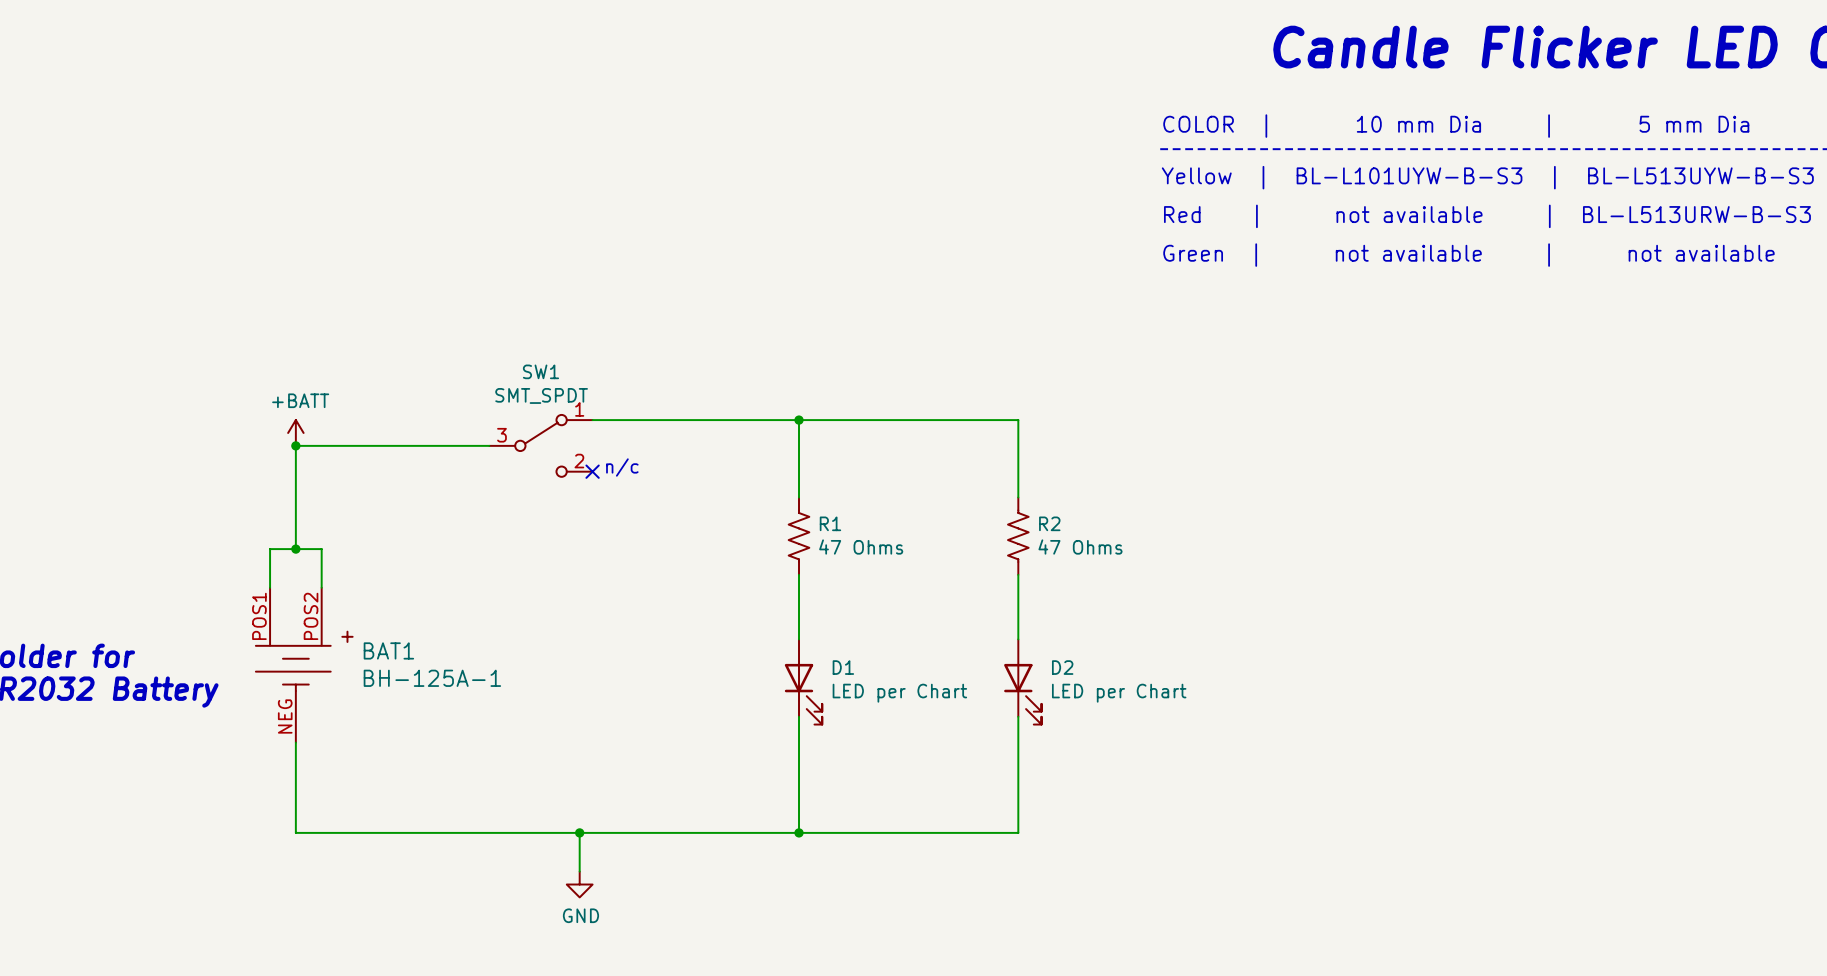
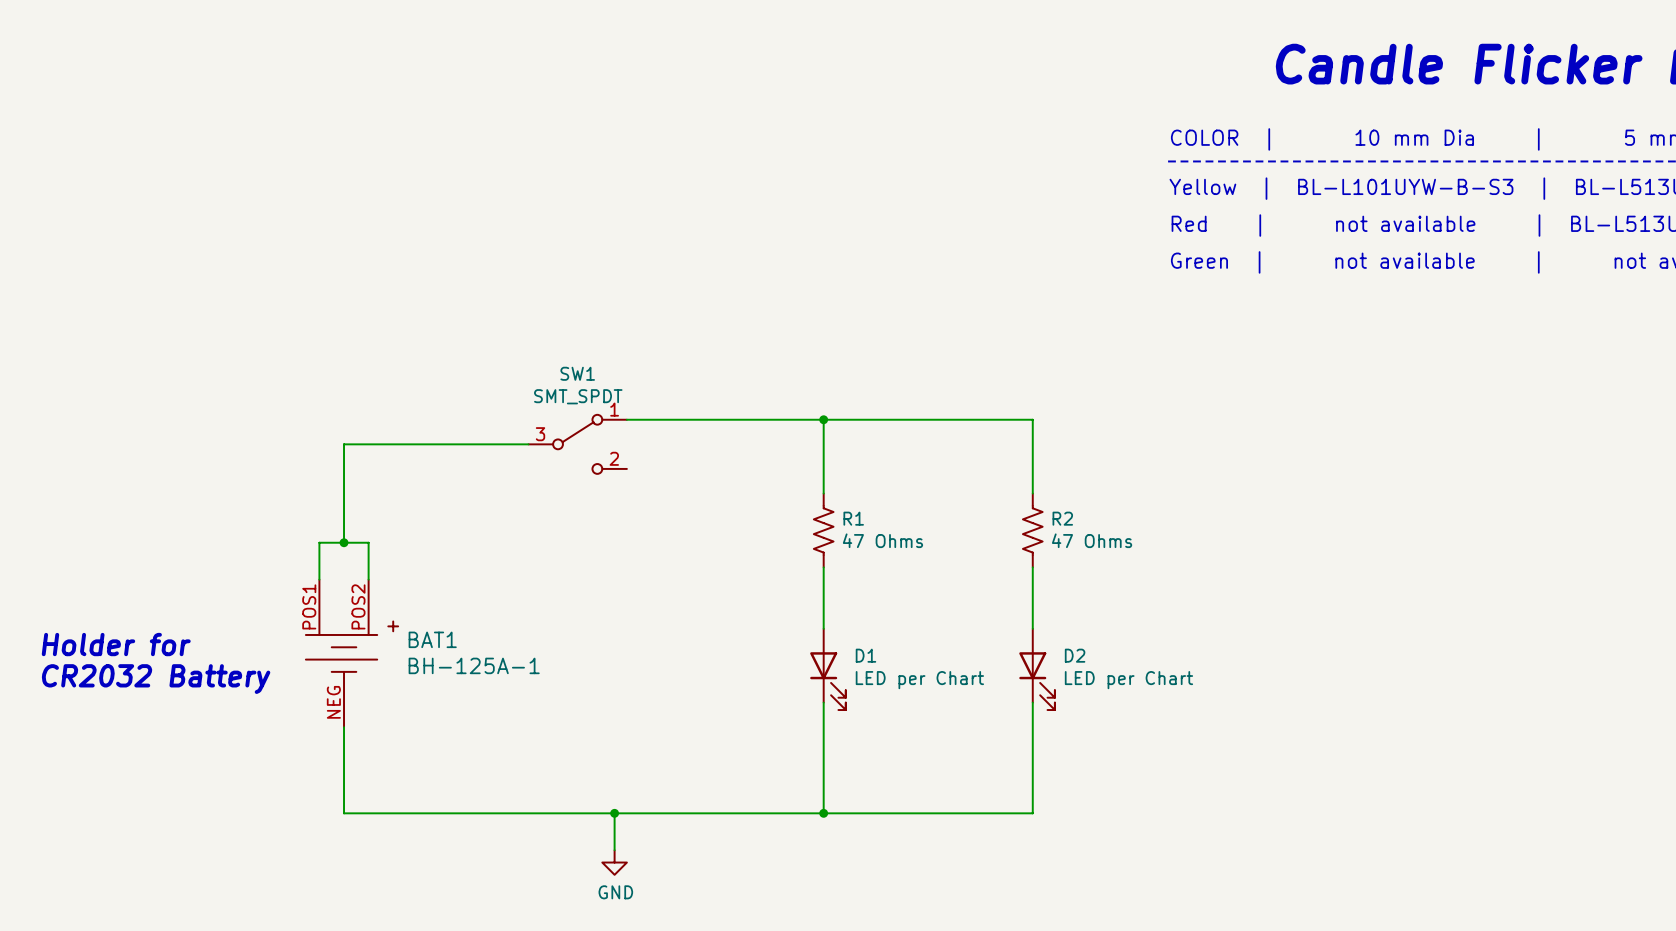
power symbol: +BATT (295, 432) -> none
junction: (295, 445) -> none
text: n/c (622, 467) -> none
no-connect mark: (592, 471) -> none

